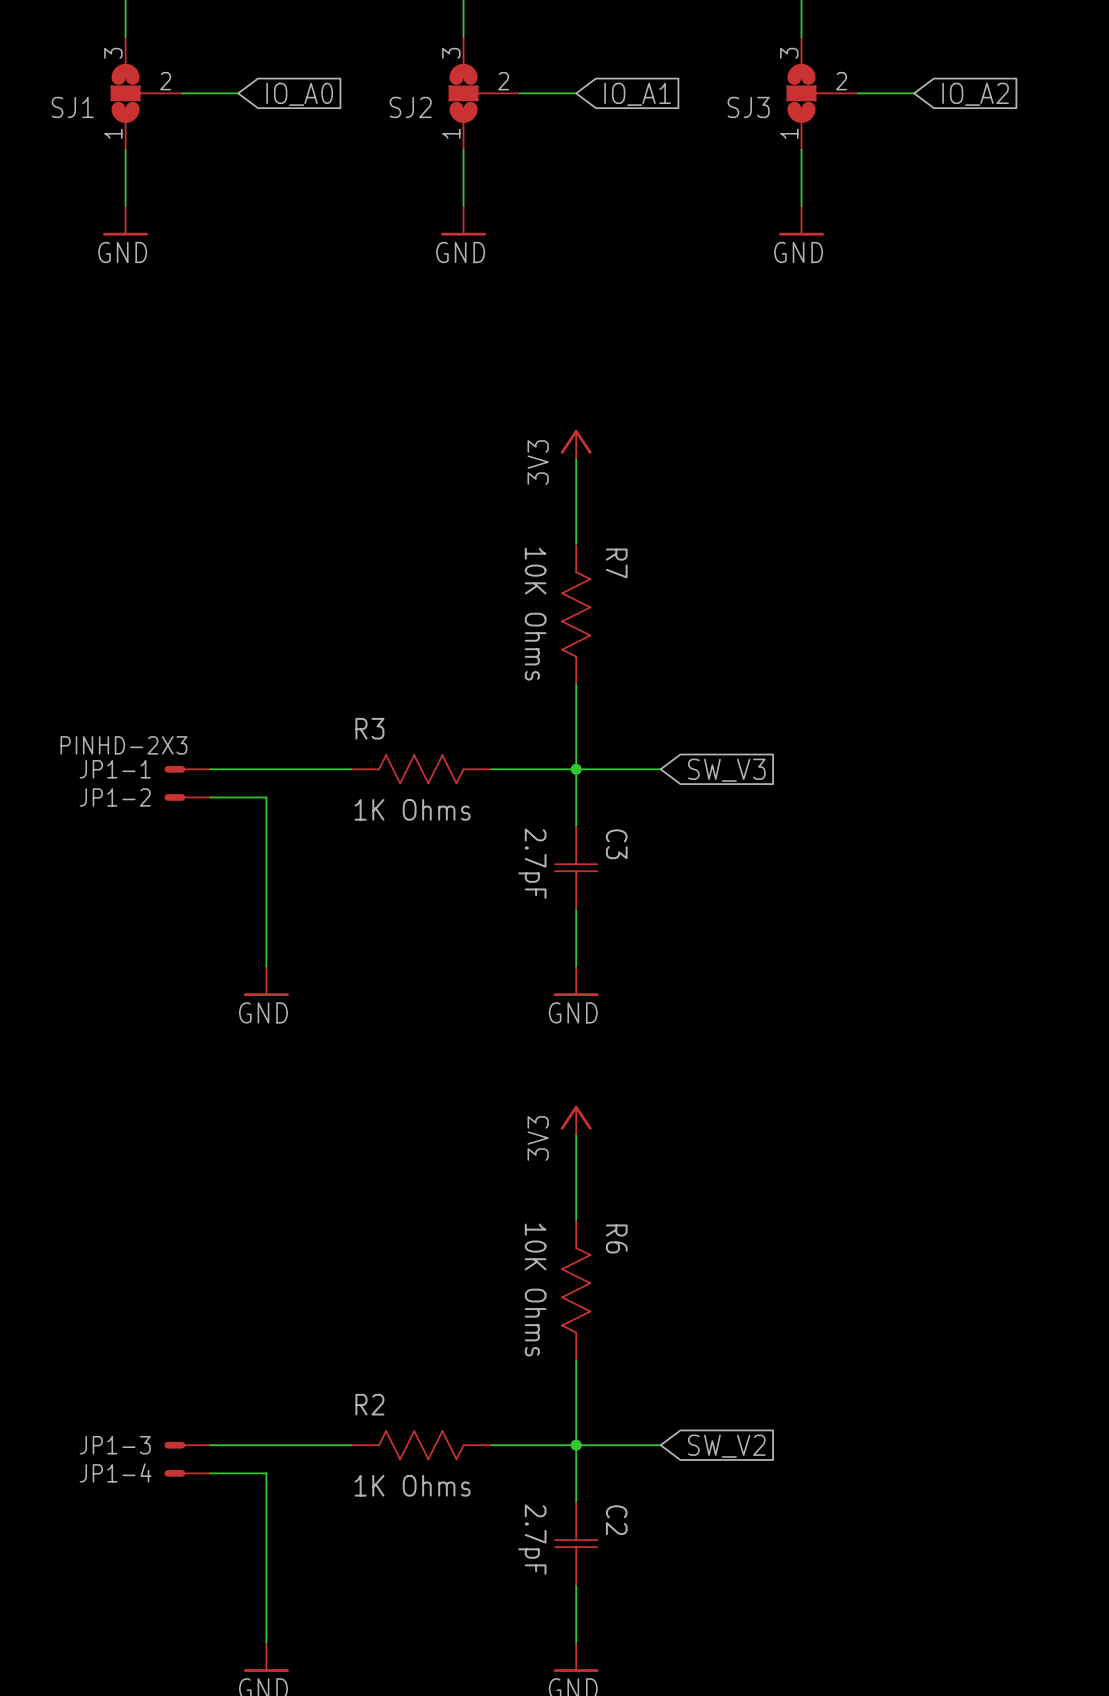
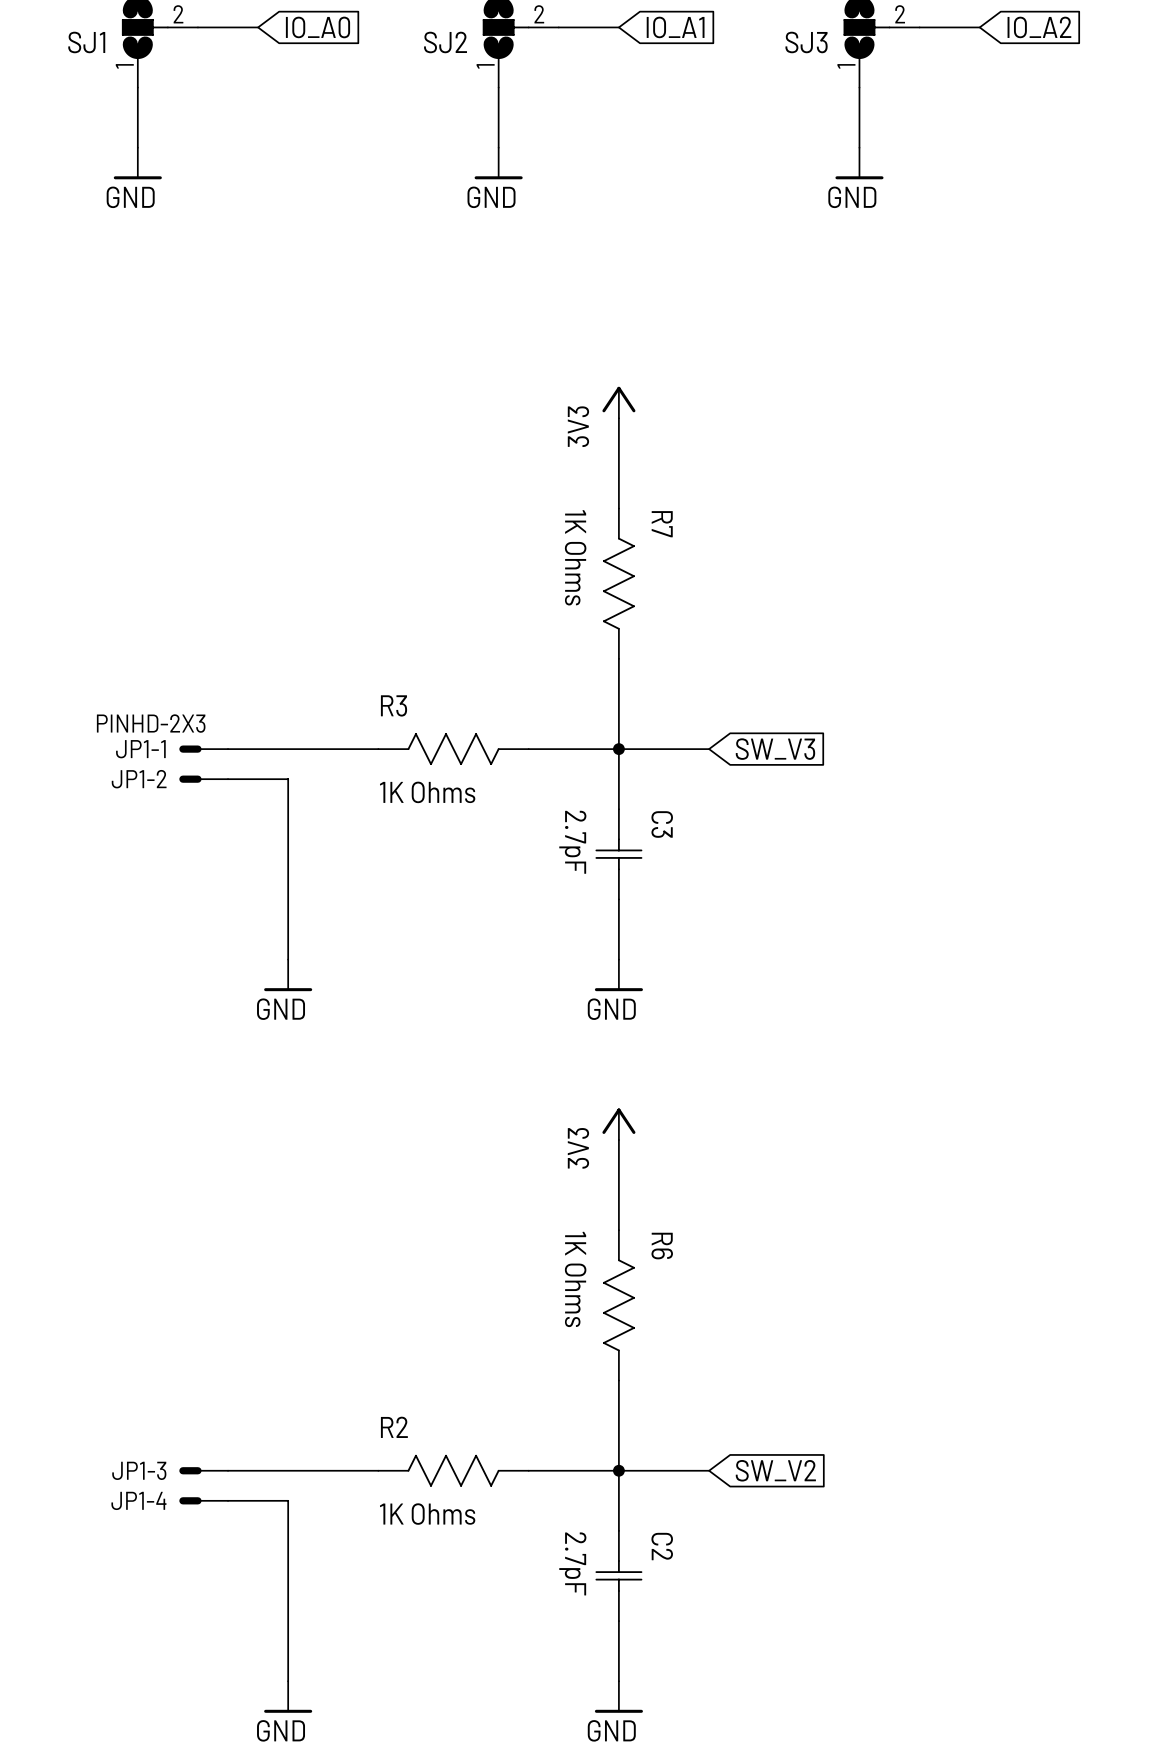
R7 value: 10K Ohms (535, 614) -> 1K Ohms (575, 557)
R6 value: 10K Ohms (535, 1290) -> 1K Ohms (575, 1279)

